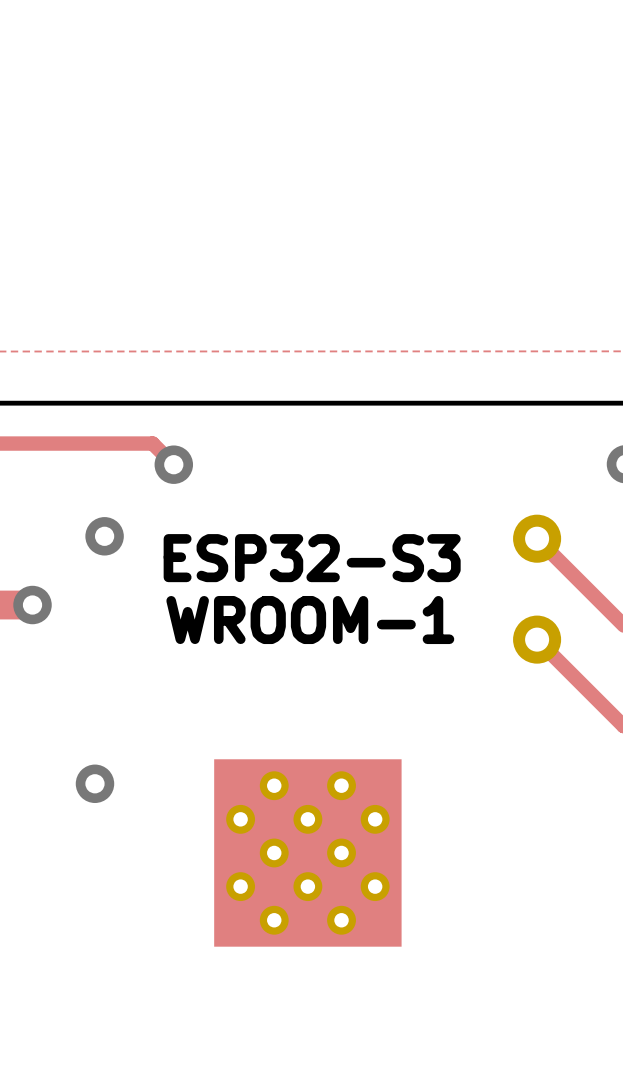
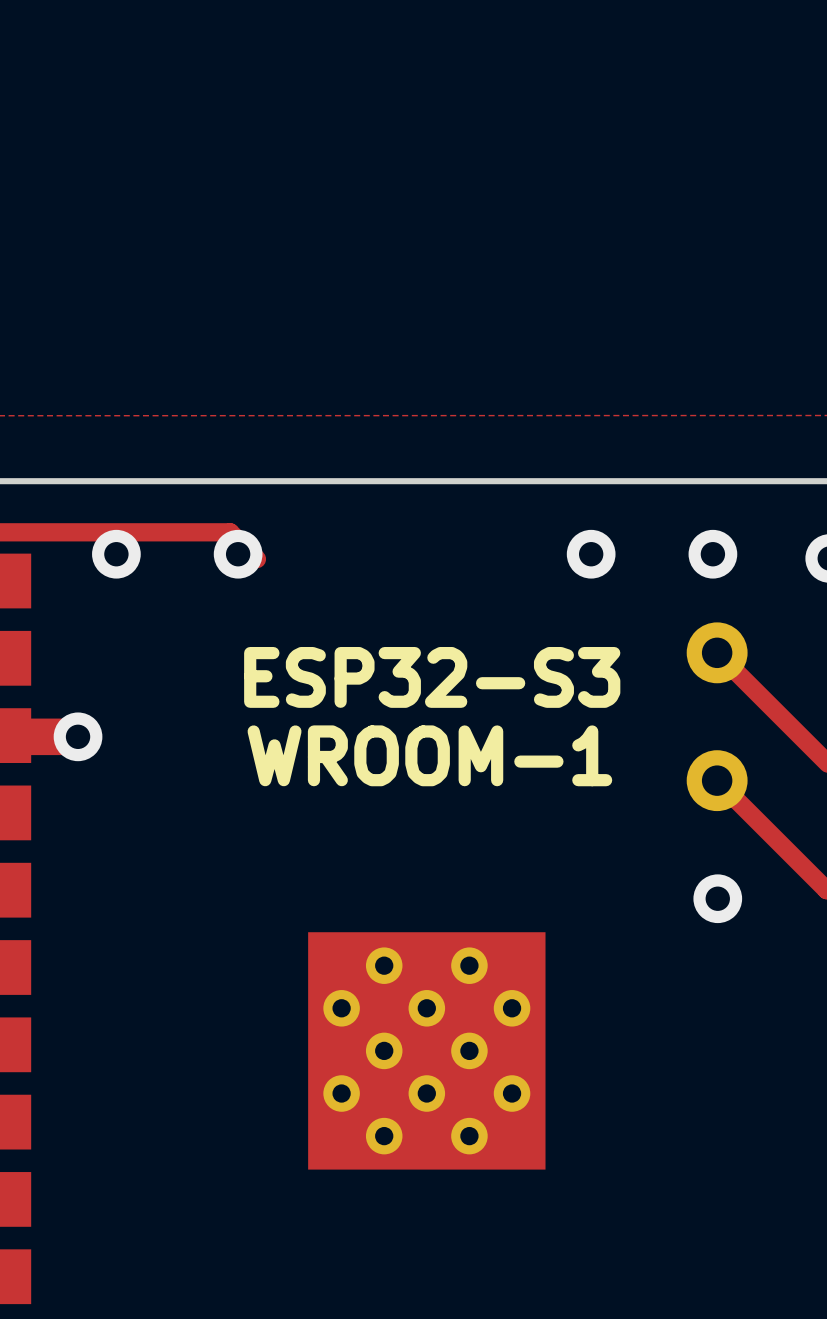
via: none -> (116, 554)
via: none -> (591, 554)
via: none -> (712, 554)
via position: (173, 464) -> (238, 554)
via: (104, 536) -> none
via: none -> (717, 898)
via: (94, 783) -> none

